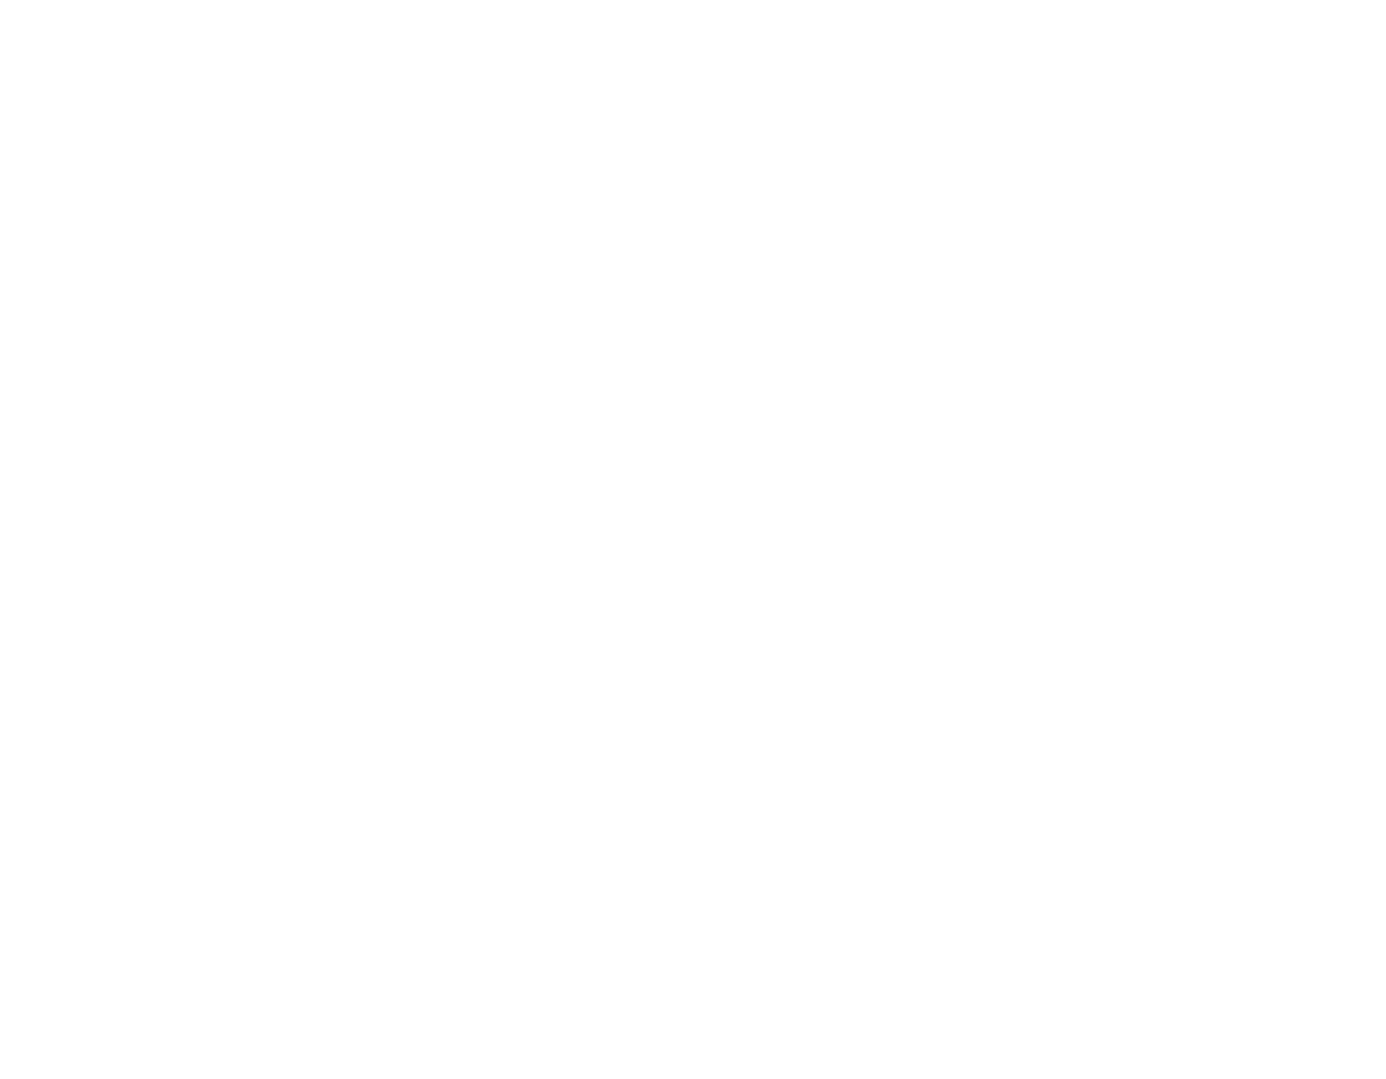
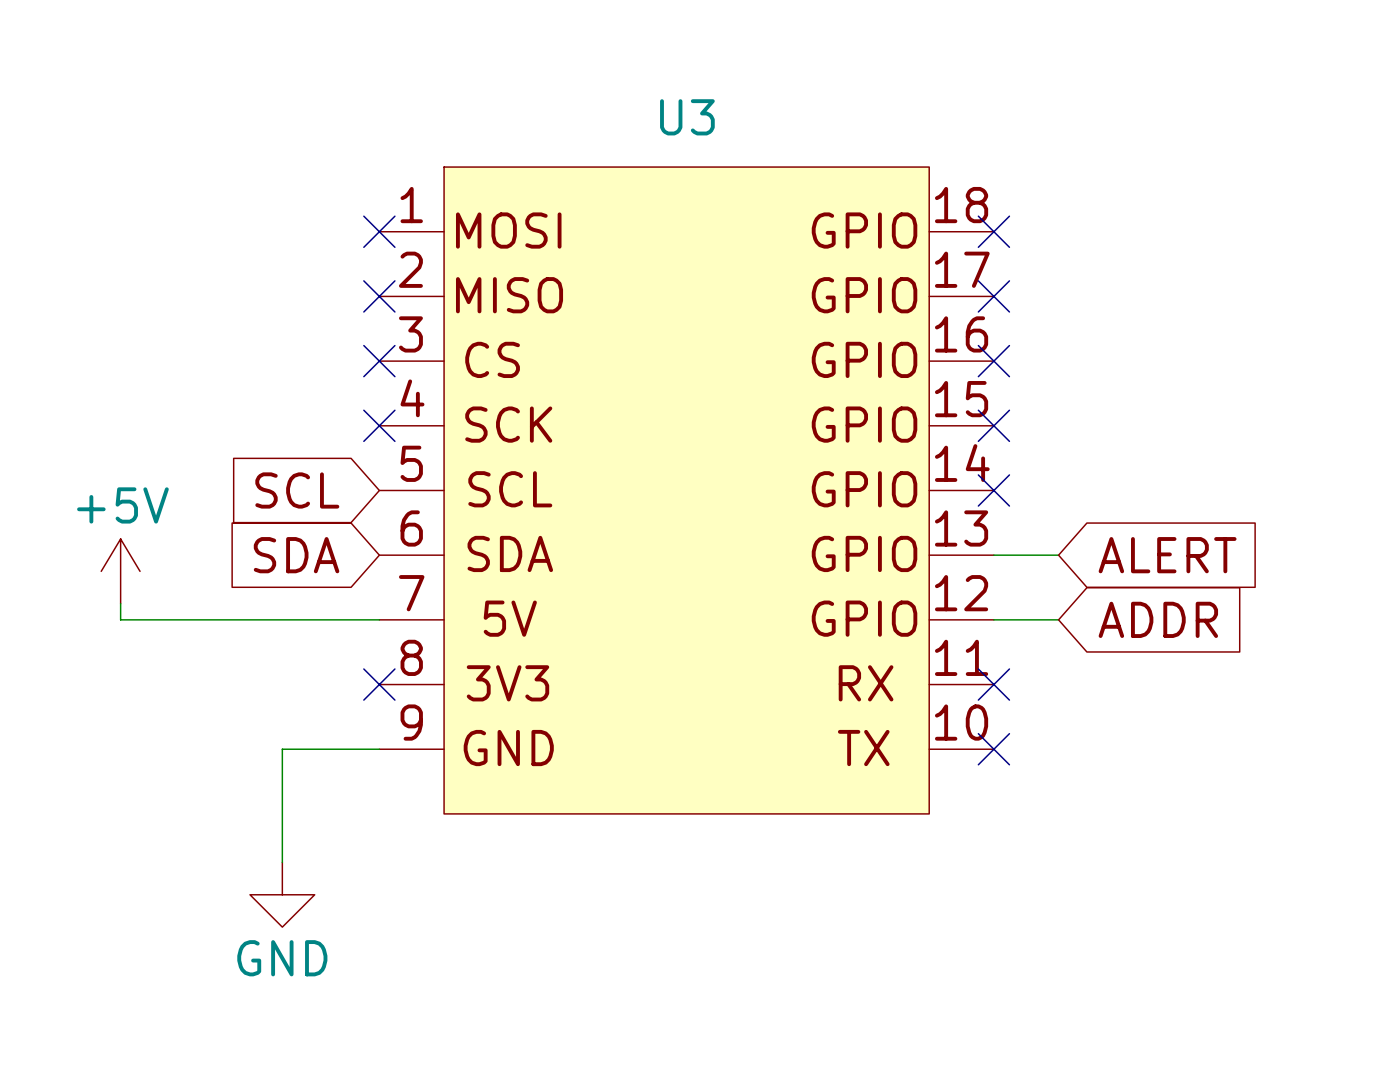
no-connect mark: none -> (379, 231)
no-connect mark: none -> (993, 231)
no-connect mark: none -> (379, 296)
no-connect mark: none -> (993, 296)
no-connect mark: none -> (379, 361)
no-connect mark: none -> (993, 361)
no-connect mark: none -> (379, 425)
no-connect mark: none -> (993, 425)
global label: none -> SCL (297, 490)
U3: none -> (686, 490)
no-connect mark: none -> (993, 490)
global label: none -> SDA (296, 555)
wire: none -> (993, 555) (1058, 555)
global label: none -> ALERT (1167, 555)
power symbol: none -> +5V (120, 571)
wire: none -> (120, 603) (120, 619) (379, 619)
wire: none -> (993, 619) (1058, 619)
global label: none -> ADDR (1158, 619)
no-connect mark: none -> (379, 684)
no-connect mark: none -> (993, 684)
wire: none -> (379, 749) (282, 749) (282, 862)
no-connect mark: none -> (993, 749)
power symbol: none -> GND (282, 894)

